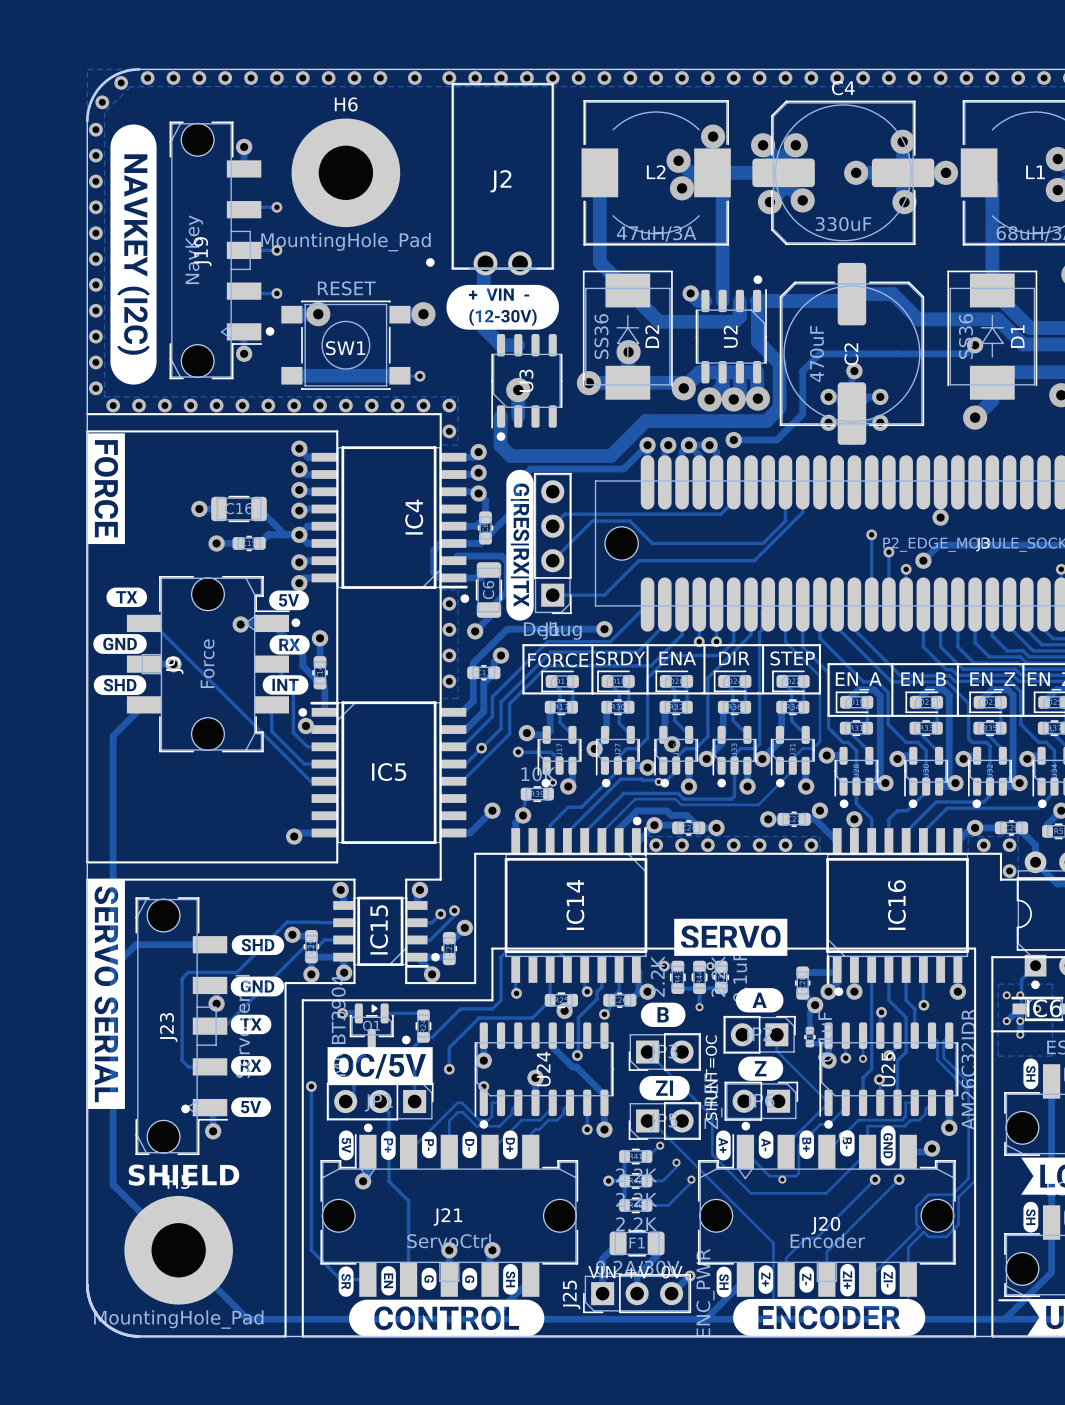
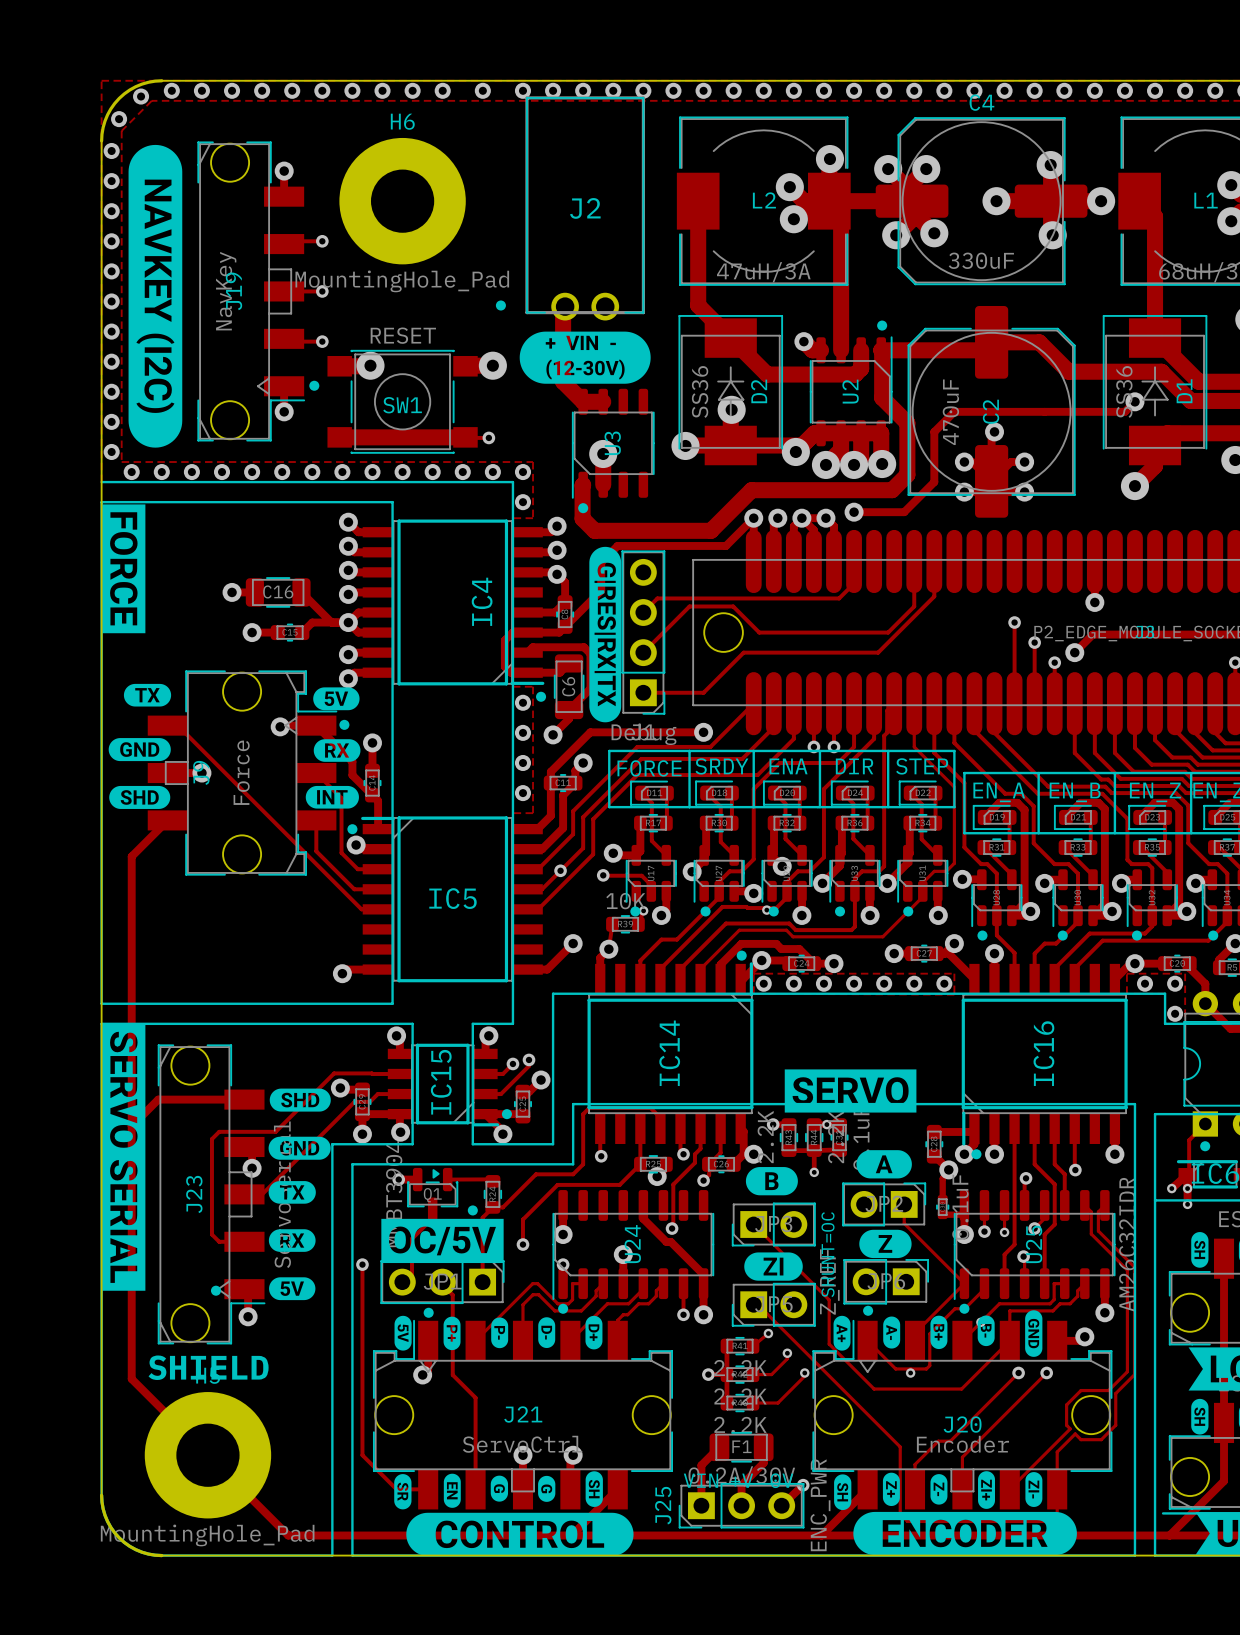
zone outline: (998, 984) (1052, 984) (1052, 1056) (998, 1056) (998, 984) -> none
via: (1006, 995) -> none
via: (1020, 995) -> none
via: (1037, 1008) -> none

